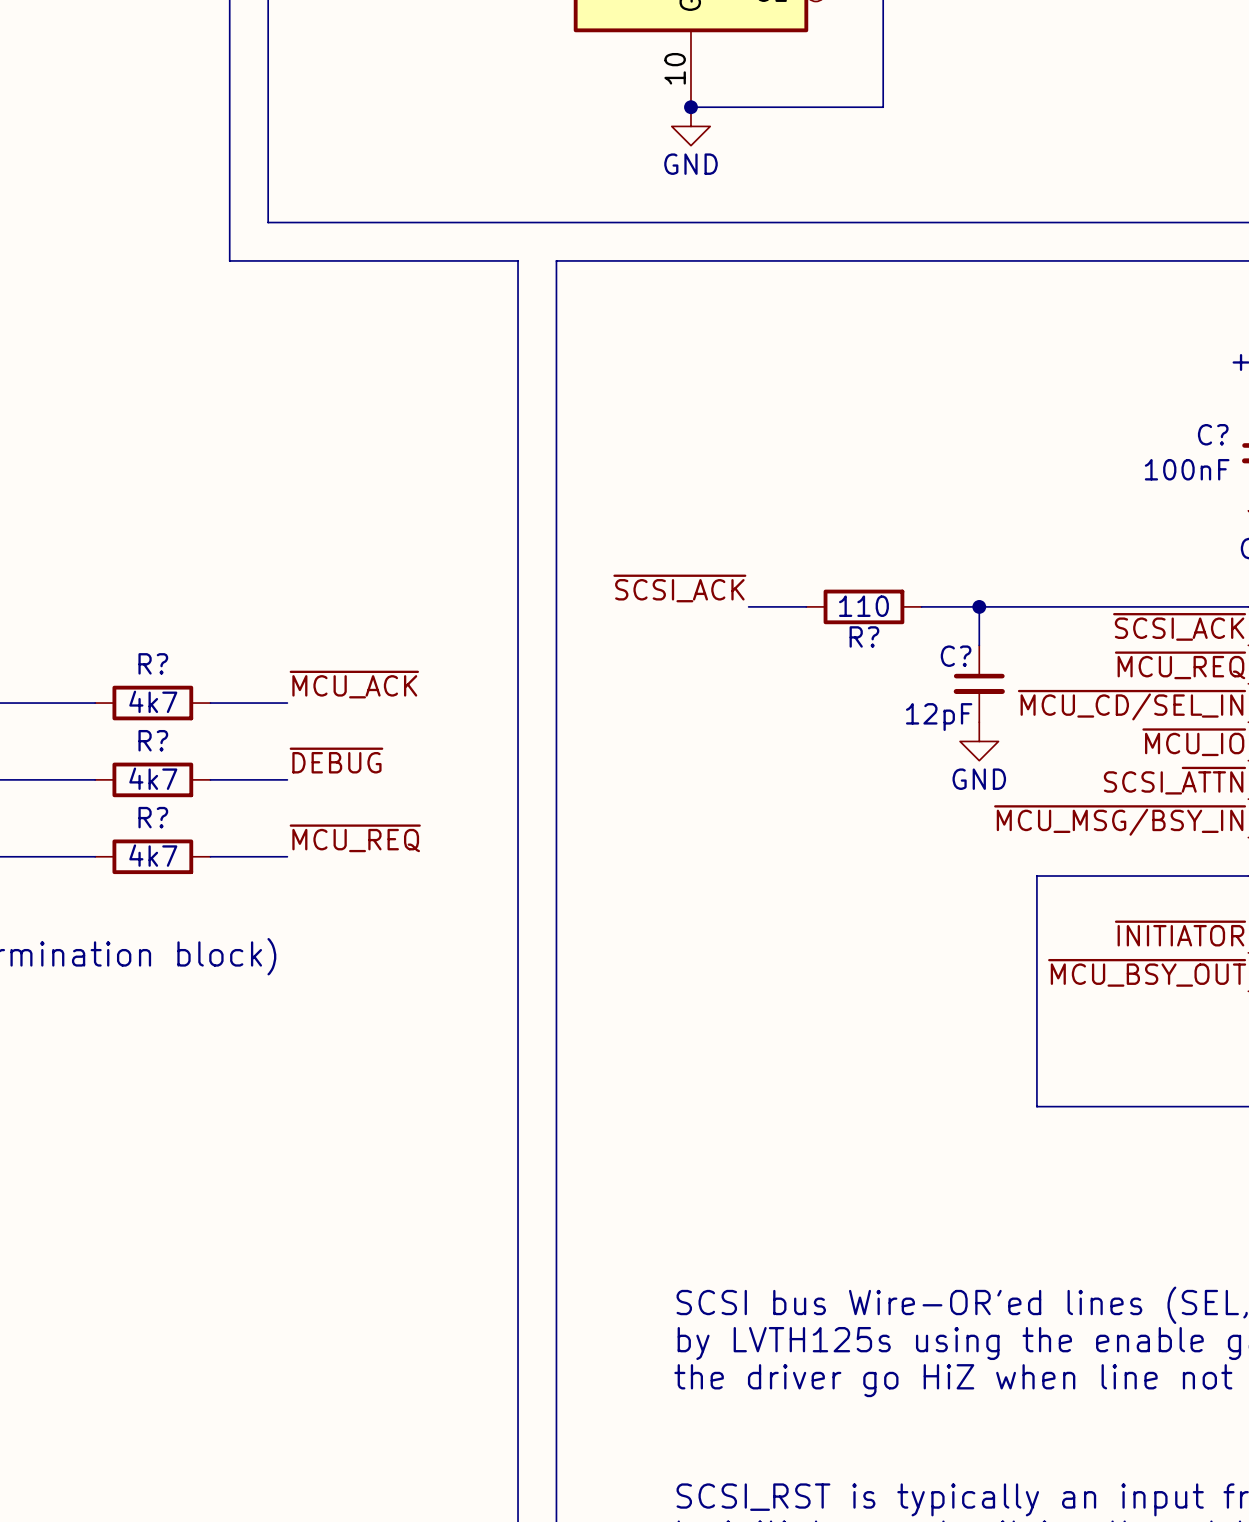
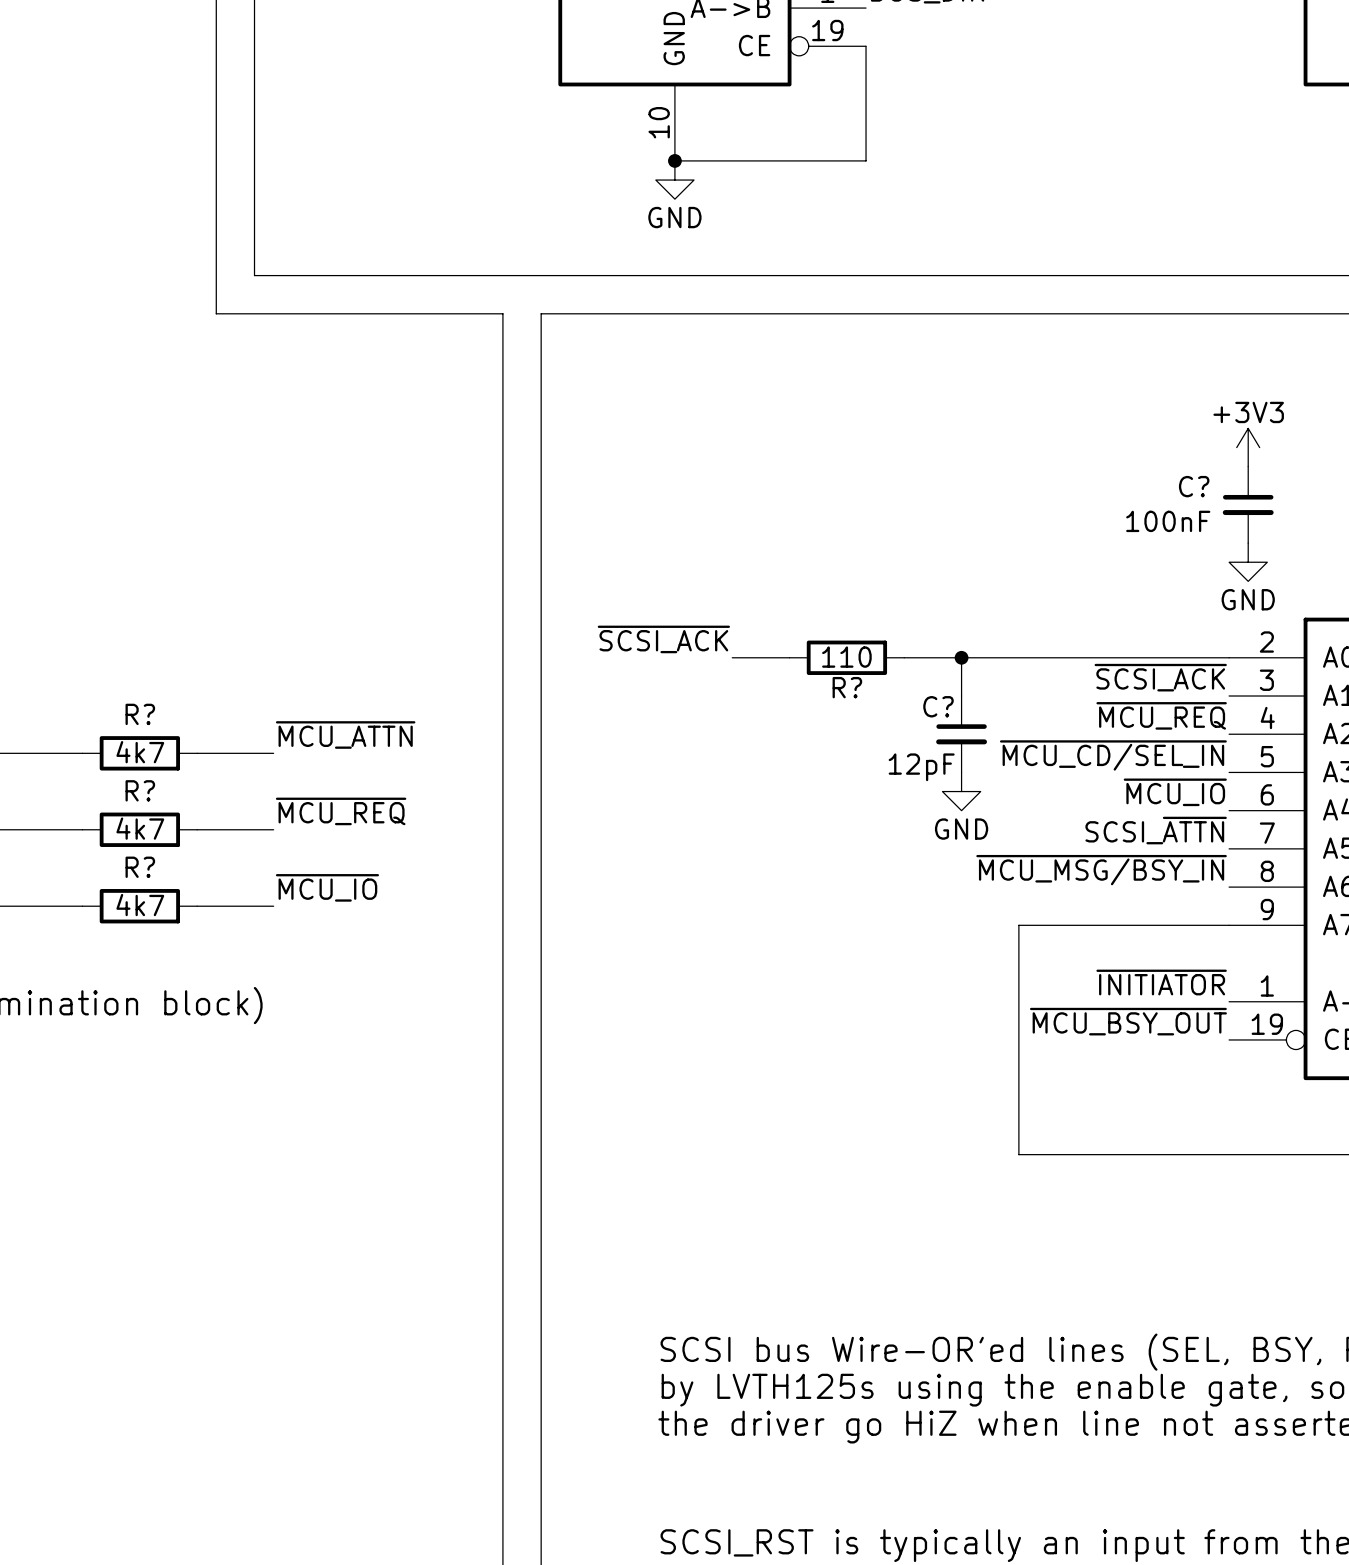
label: ~{MCU_ACK} (354, 684) -> ~{MCU_ATTN} (345, 734)
label: ~{DEBUG} (336, 760) -> ~{MCU_REQ} (341, 811)
label: ~{MCU_REQ} (355, 838) -> ~{MCU_IO} (327, 887)

